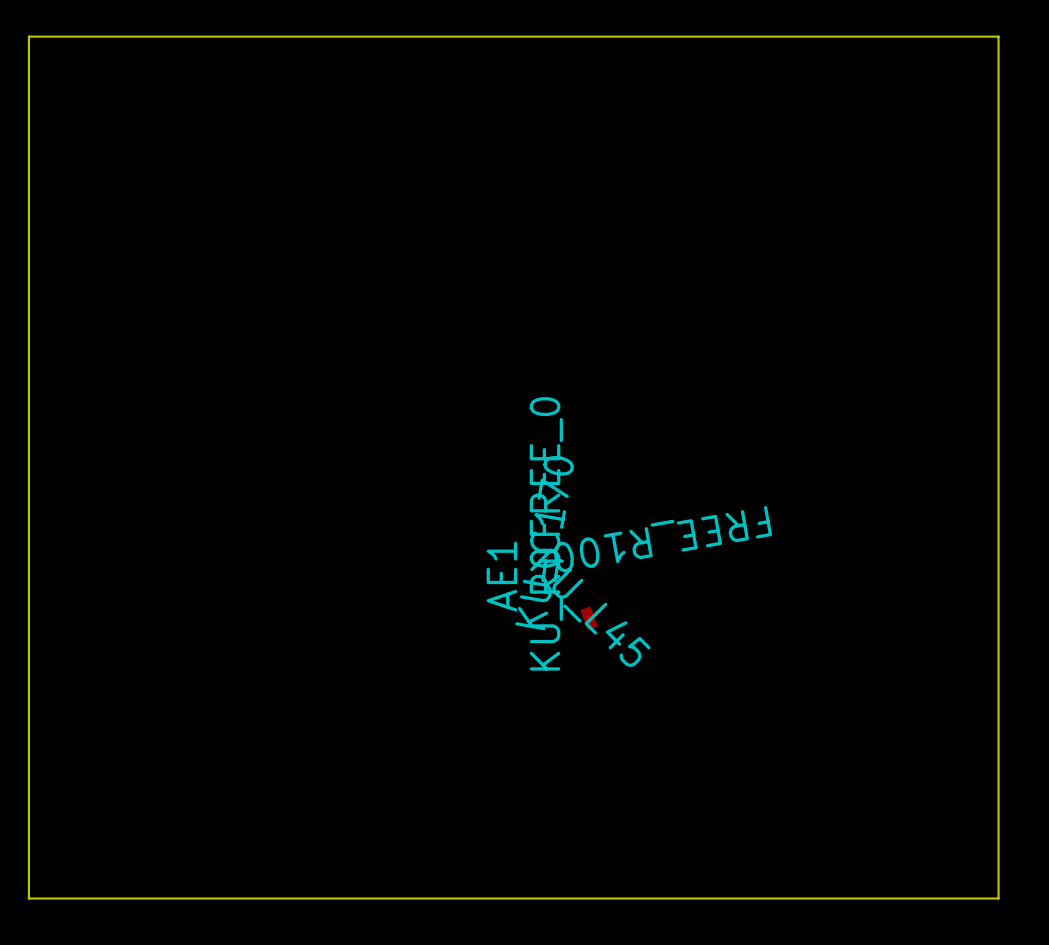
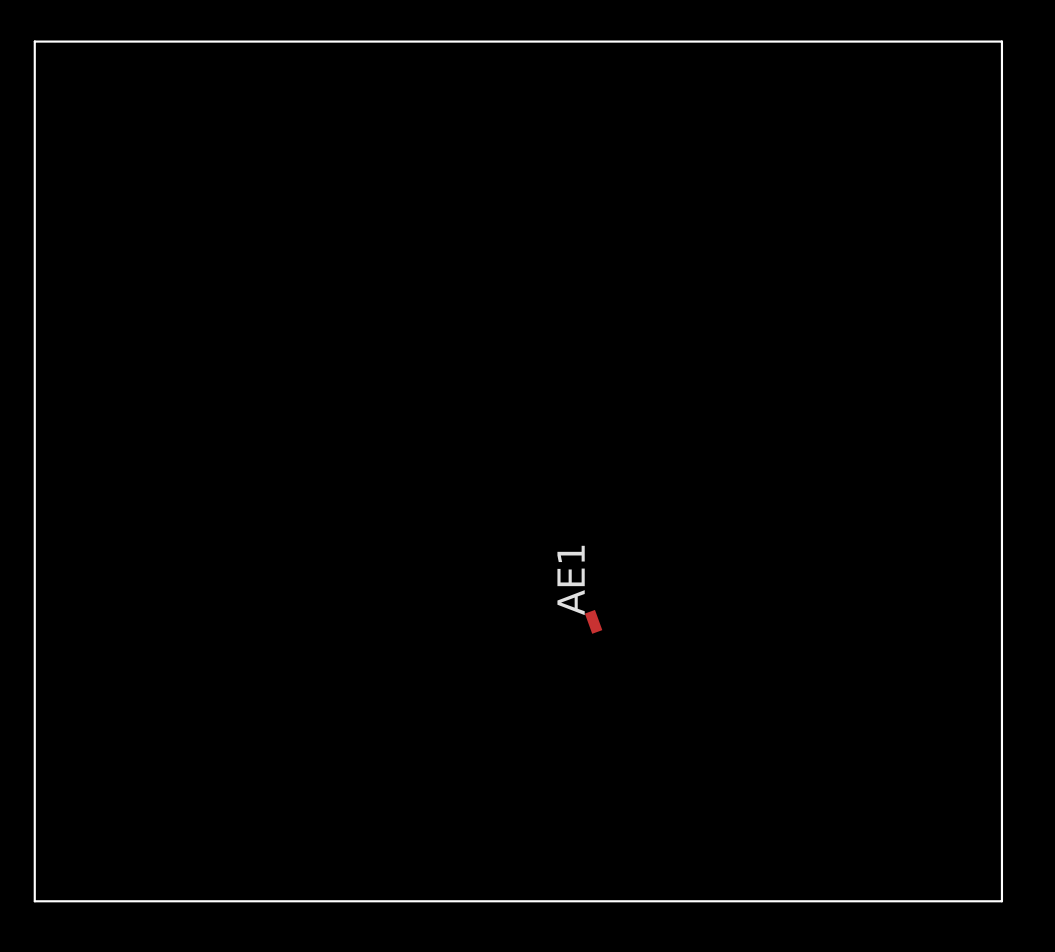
AE1 name position: AE1 (501, 576) -> AE1 (571, 580)
AE1 footprint: [580, 606, 598, 631] -> [584, 609, 603, 634]

